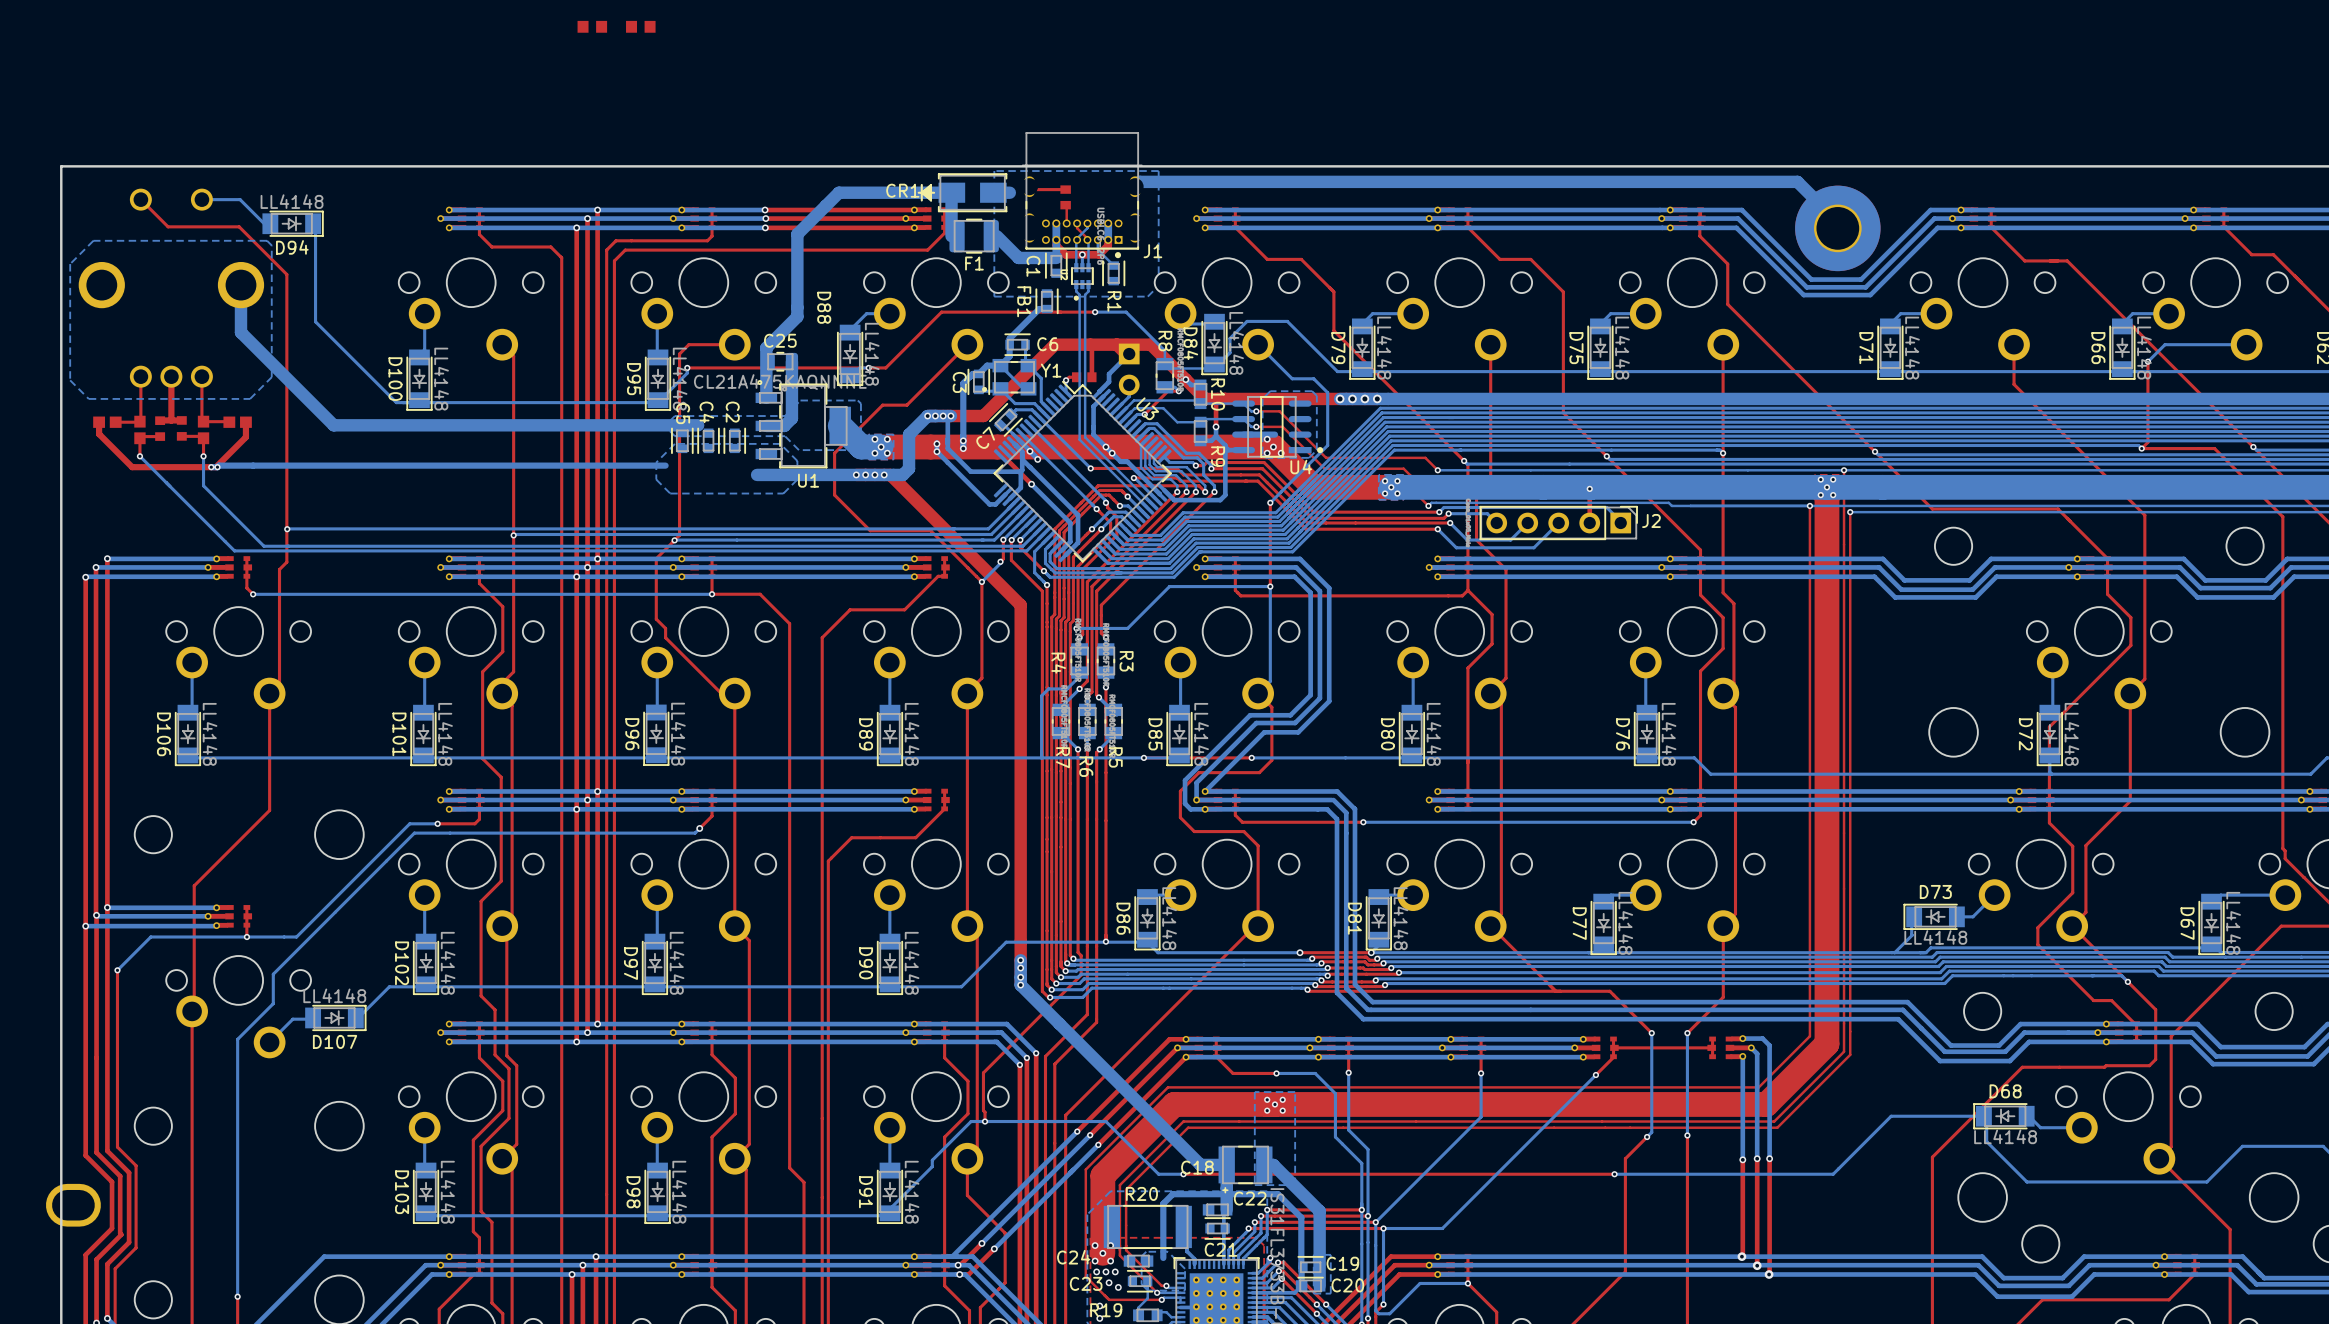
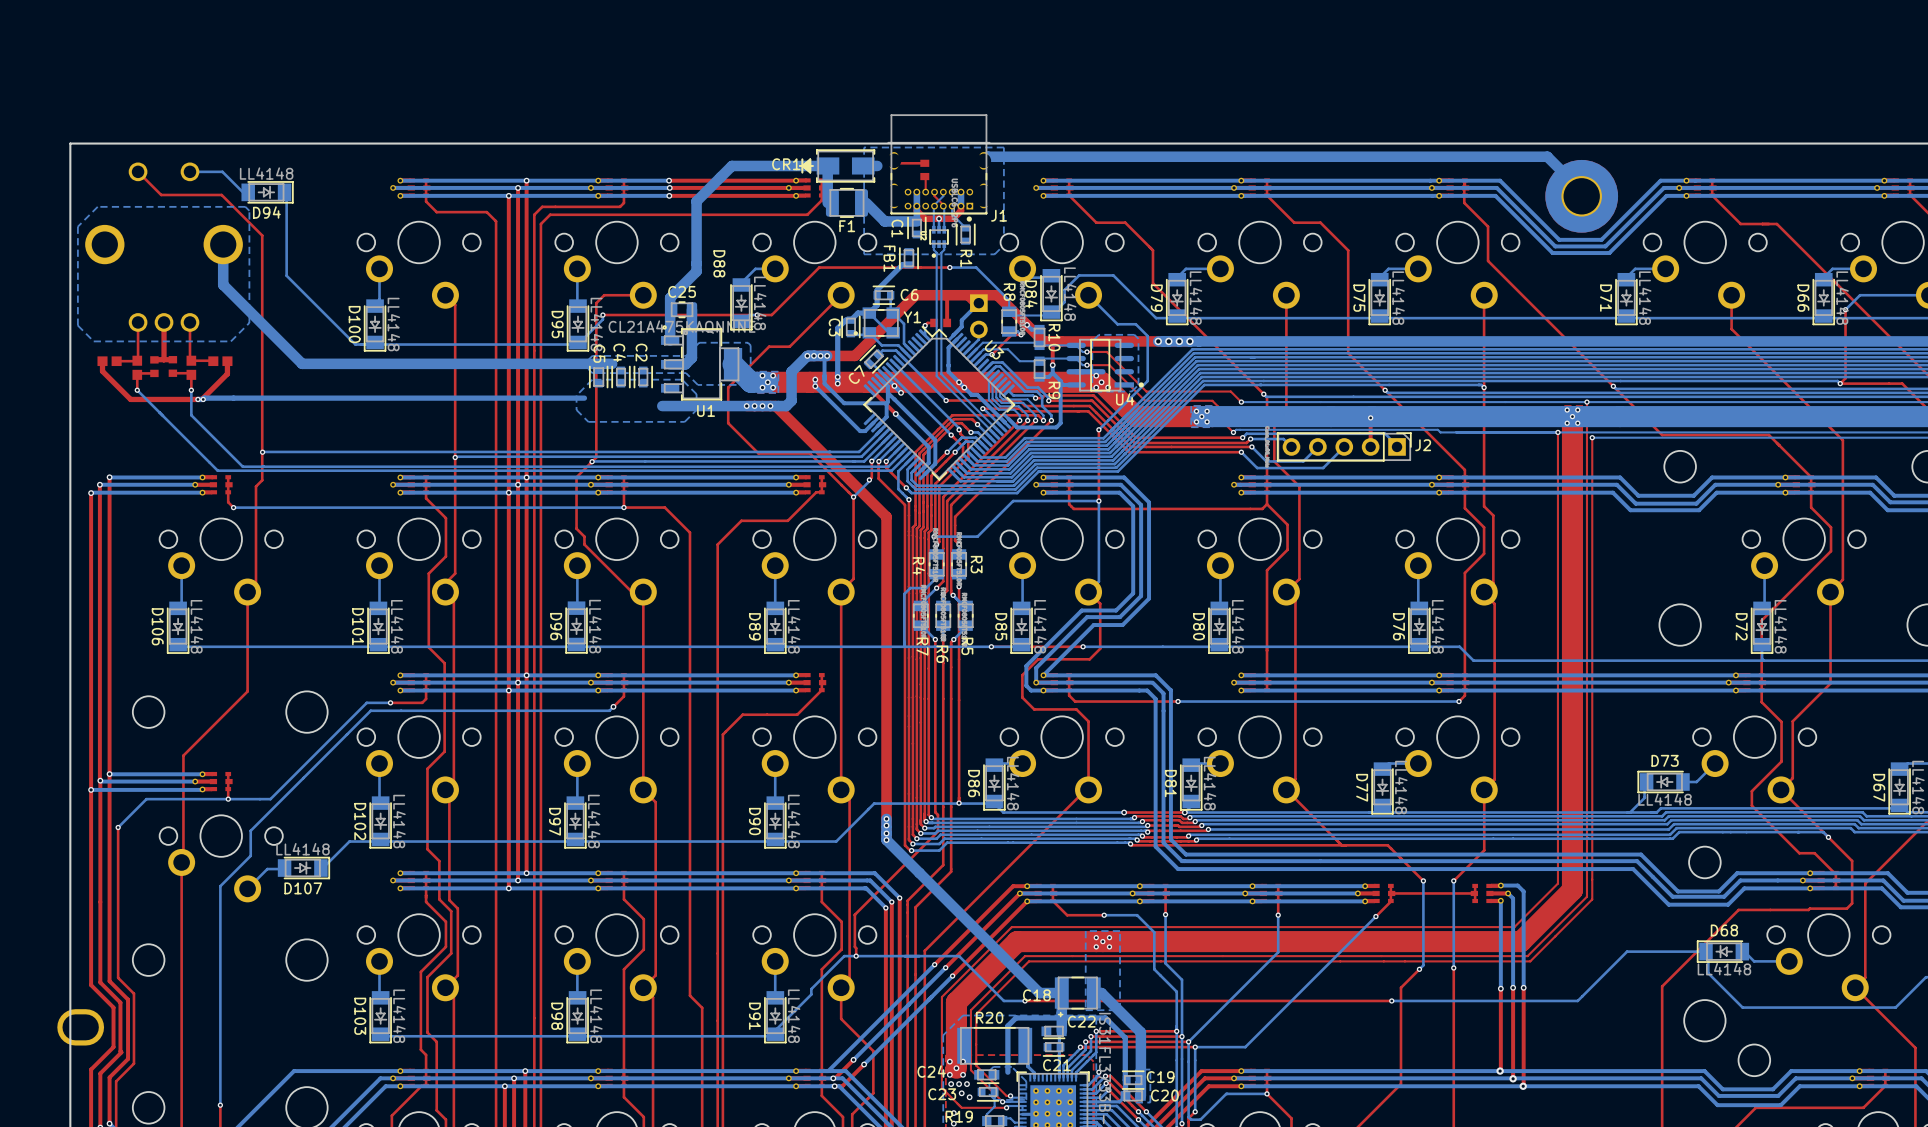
part: (592, 26) -> none
part: (640, 26) -> none

